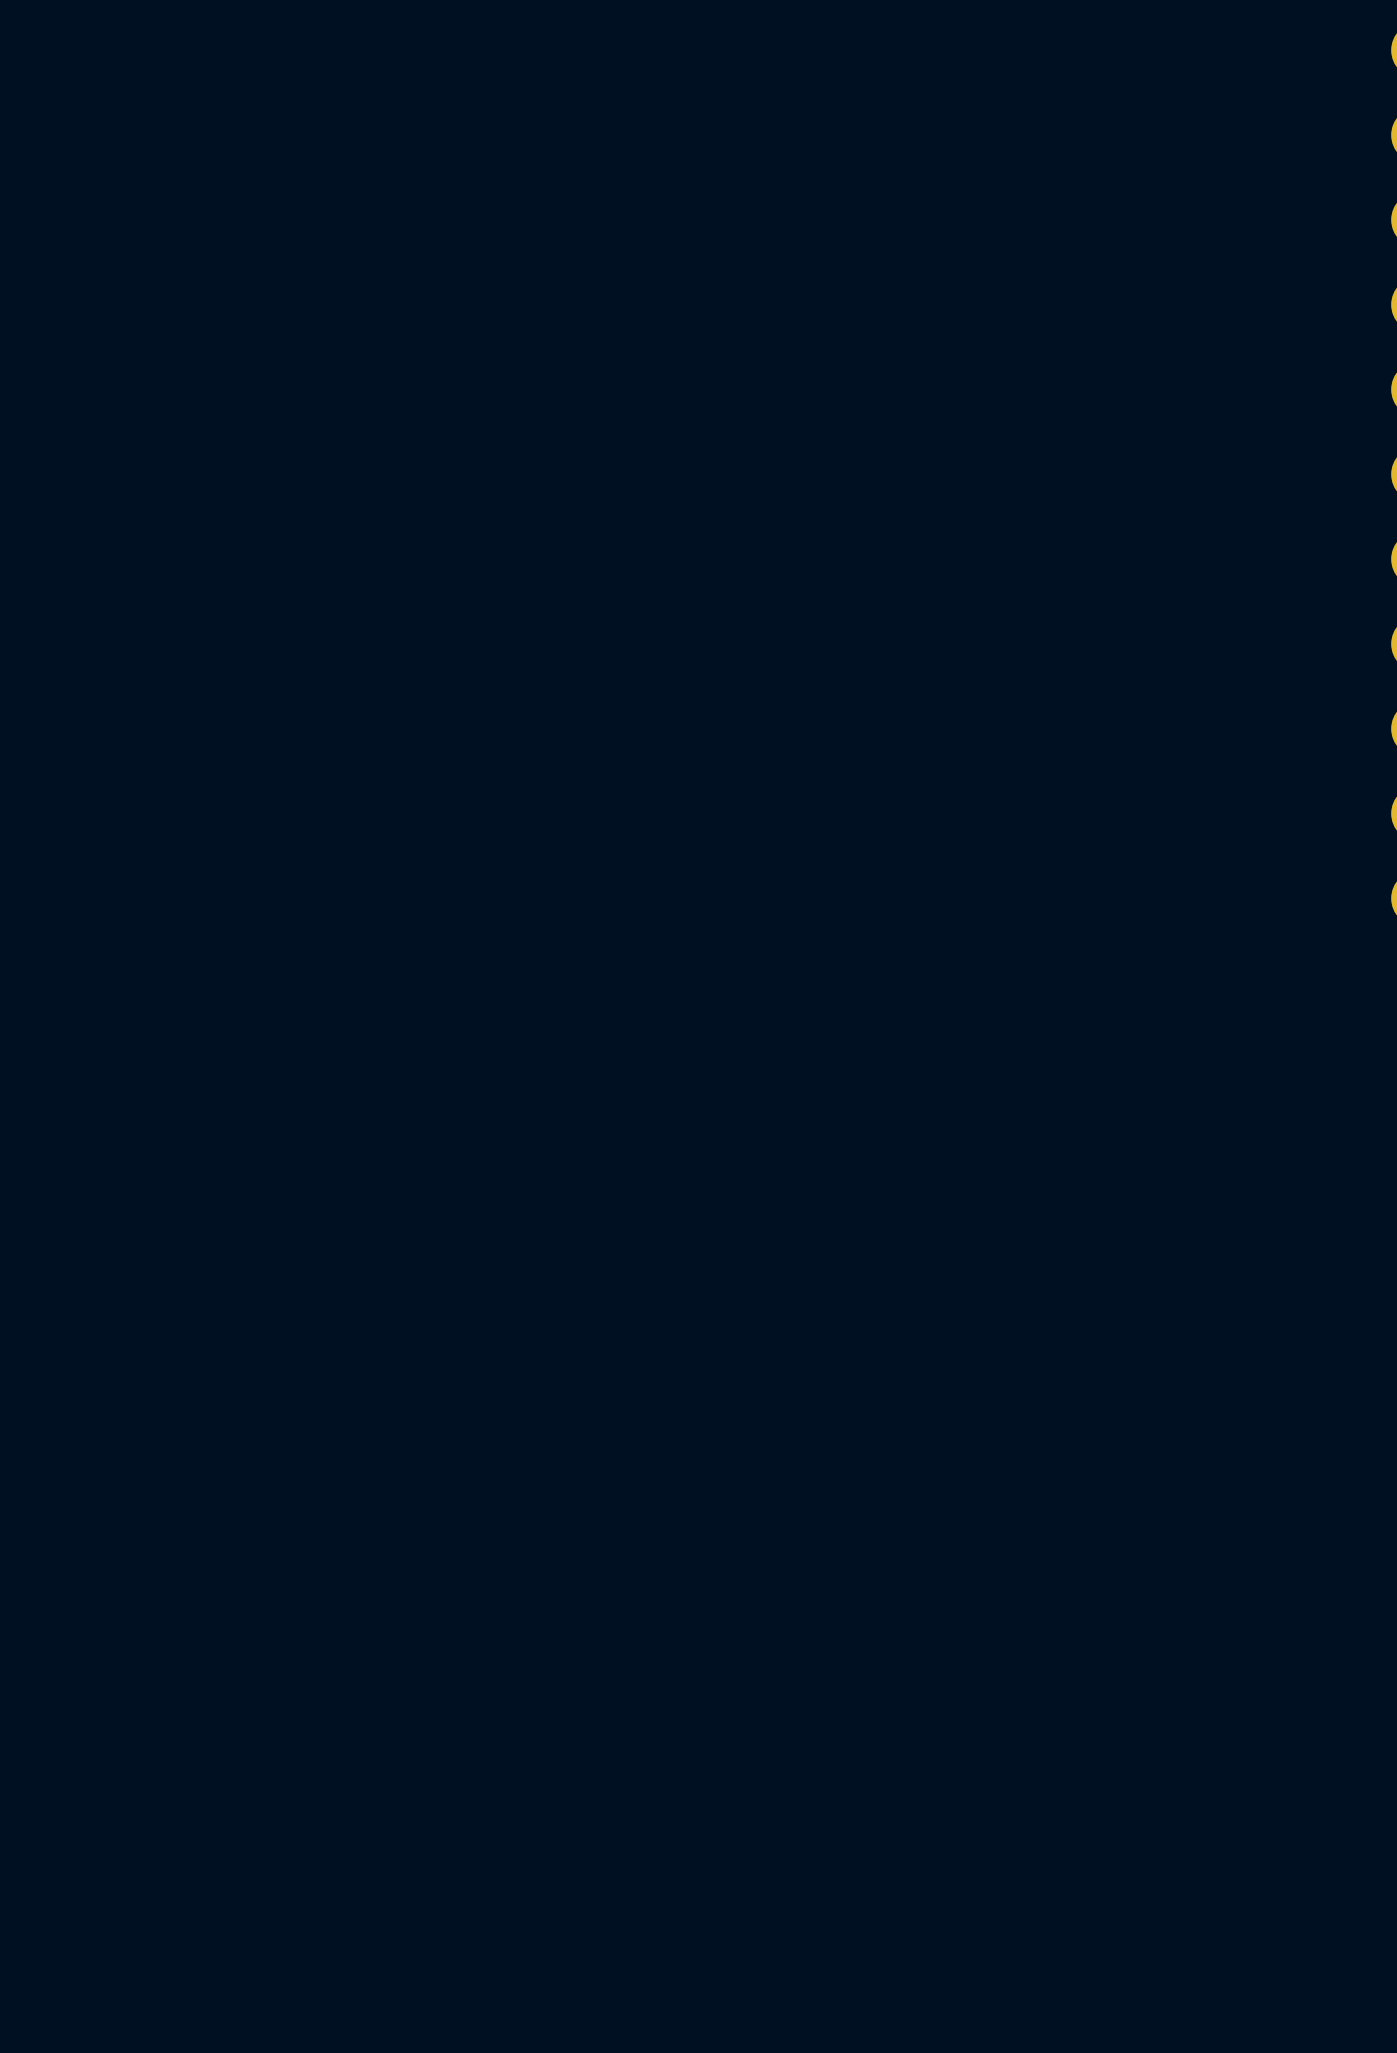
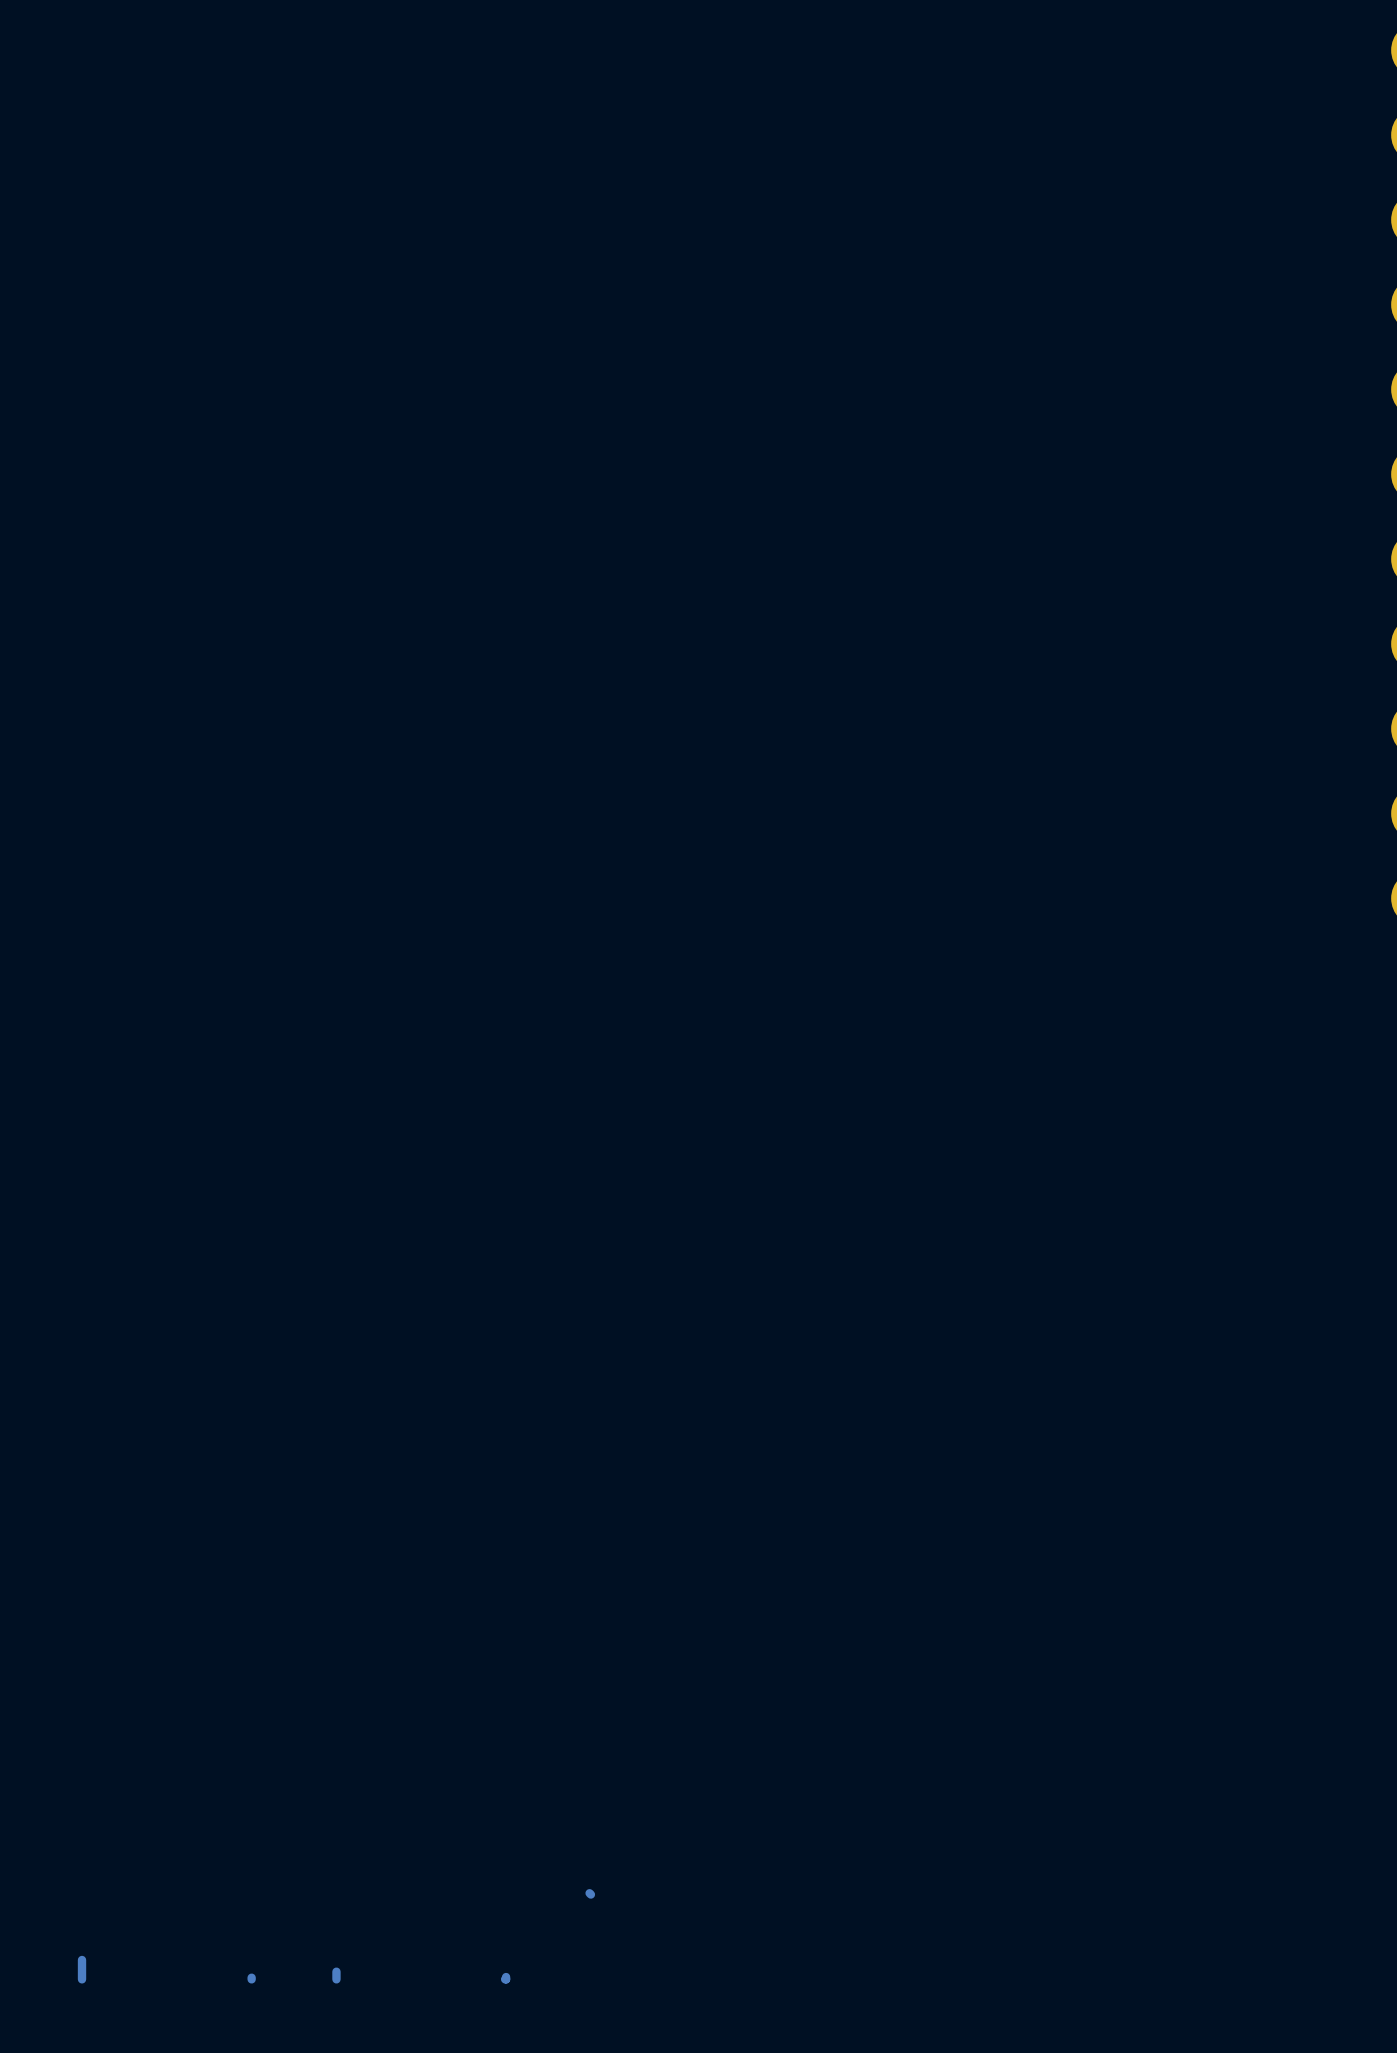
track: none -> (589, 1893) (590, 1894)
track: none -> (82, 1959) (82, 1979)
track: none -> (336, 1971) (336, 1979)
track: none -> (251, 1977) (251, 1979)
track: none -> (506, 1977) (505, 1979)

